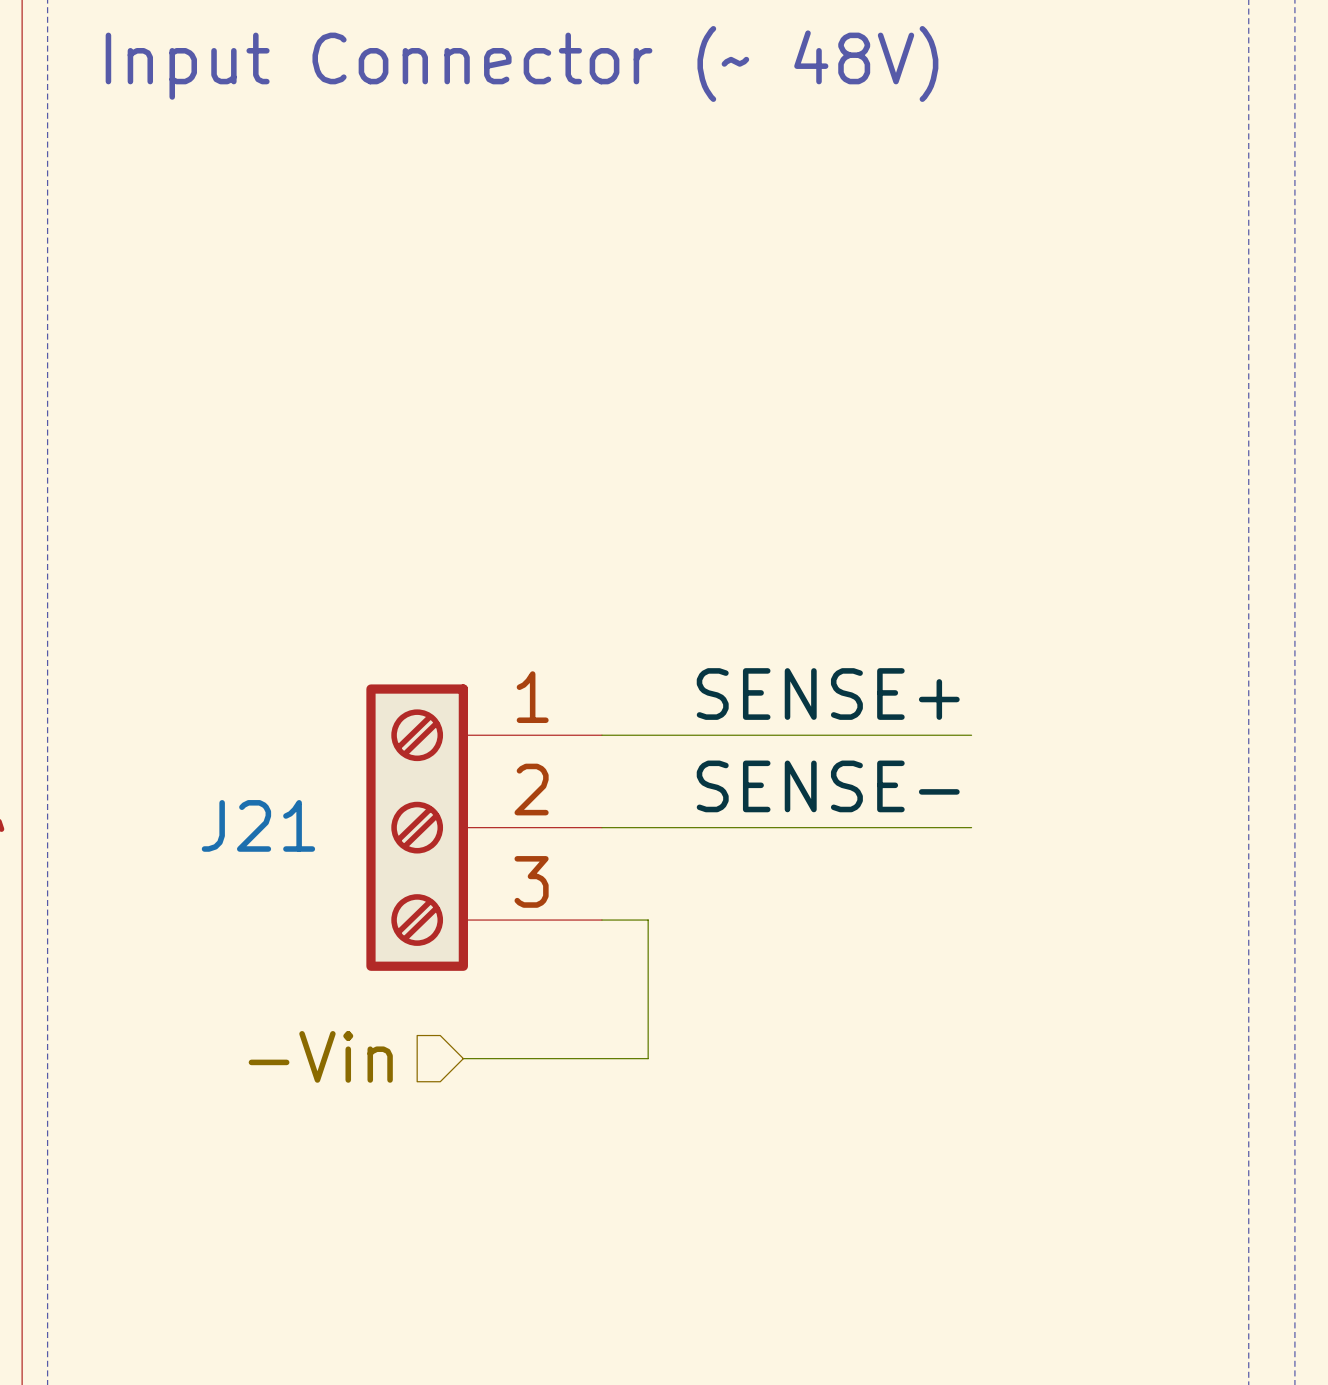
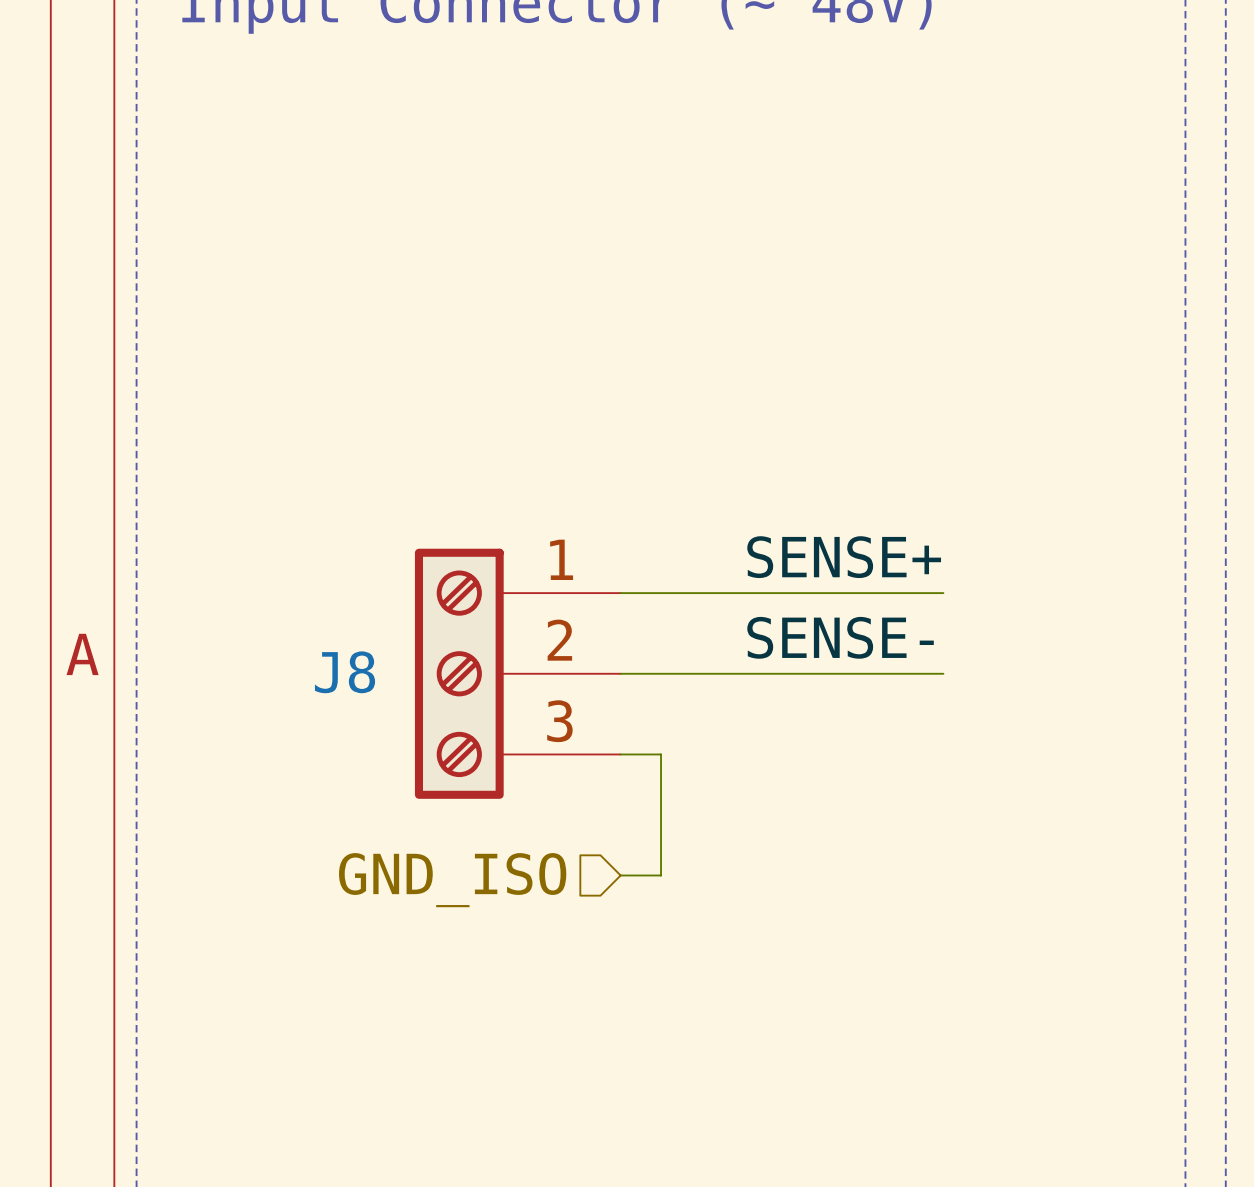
J21 name: J21 (258, 825) -> J8 (345, 672)
hierarchical label: -Vin (320, 1056) -> none
wire: (463, 1058) (601, 1058) -> none
hierarchical label: none -> GND_ISO (452, 880)

